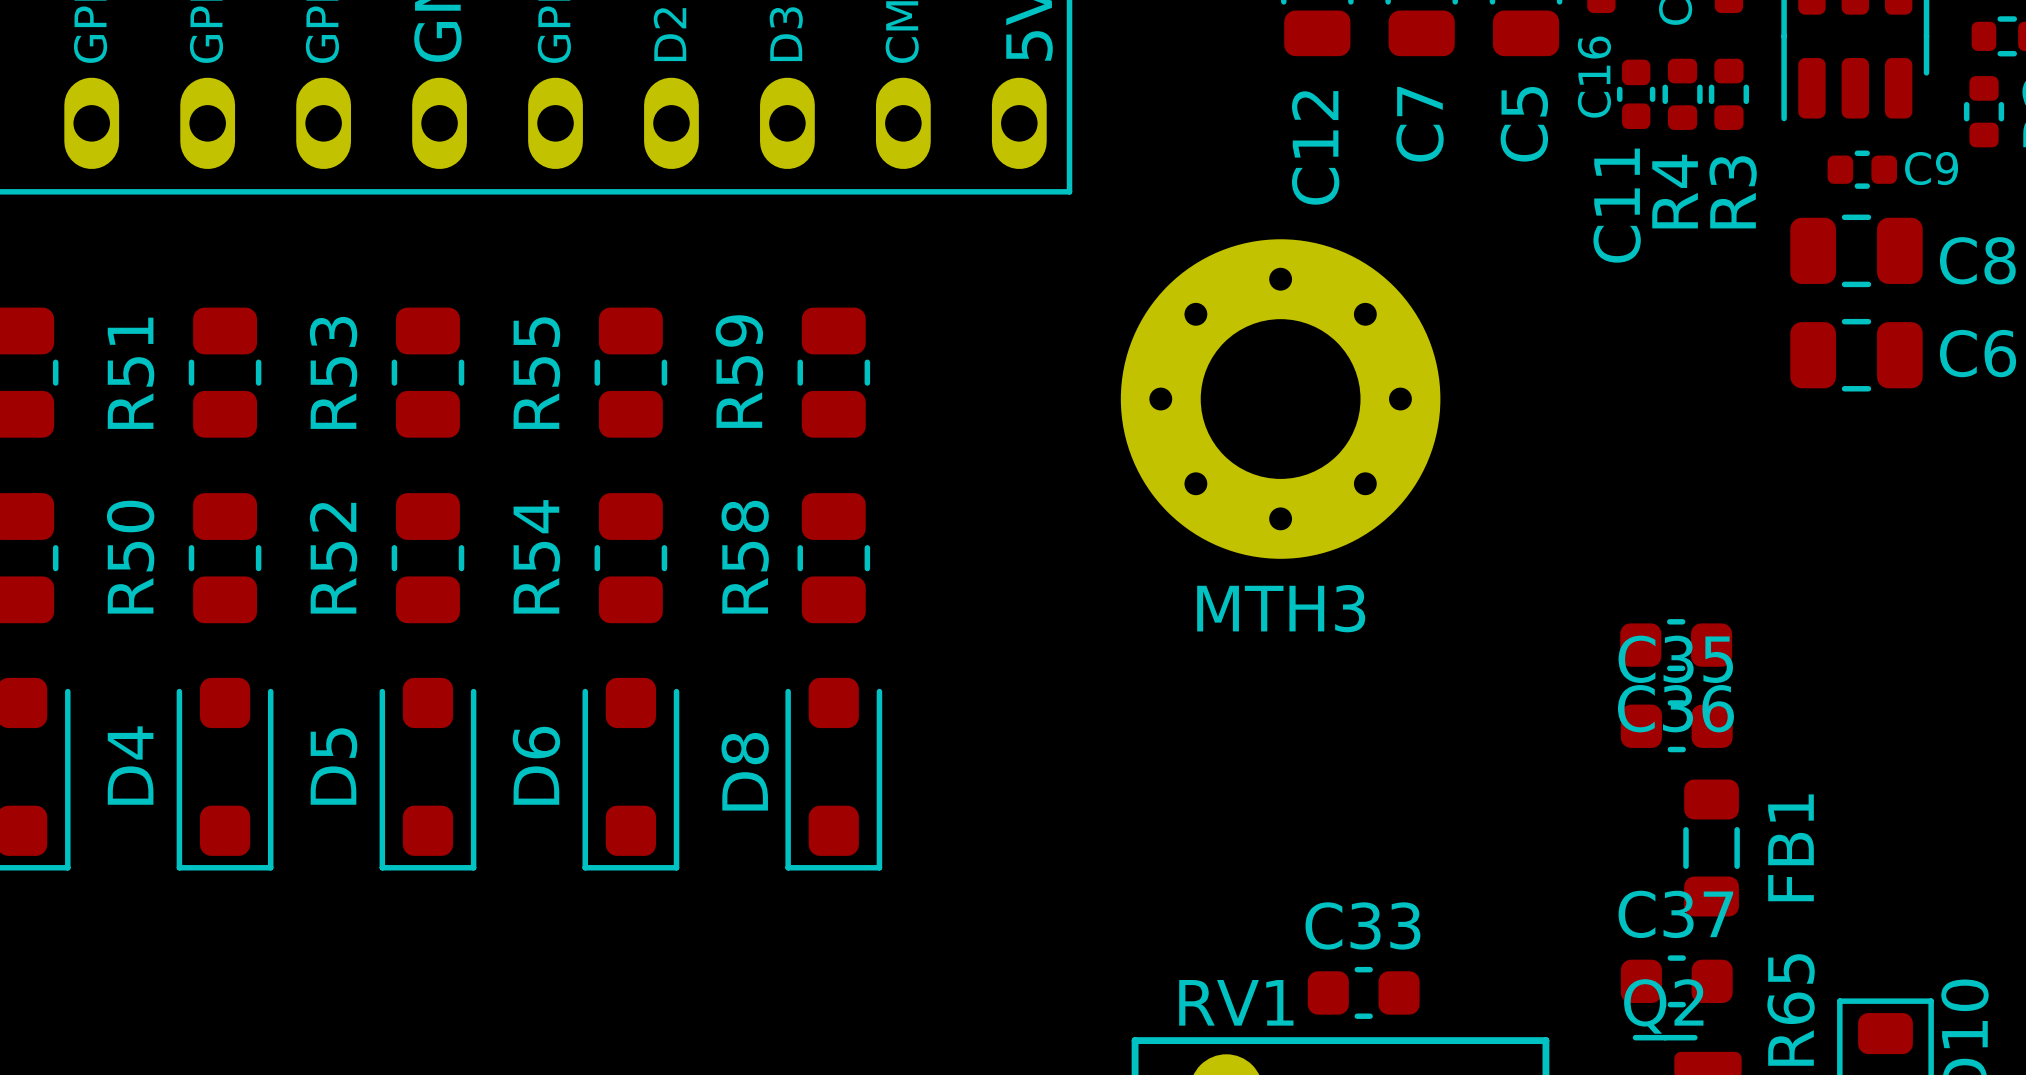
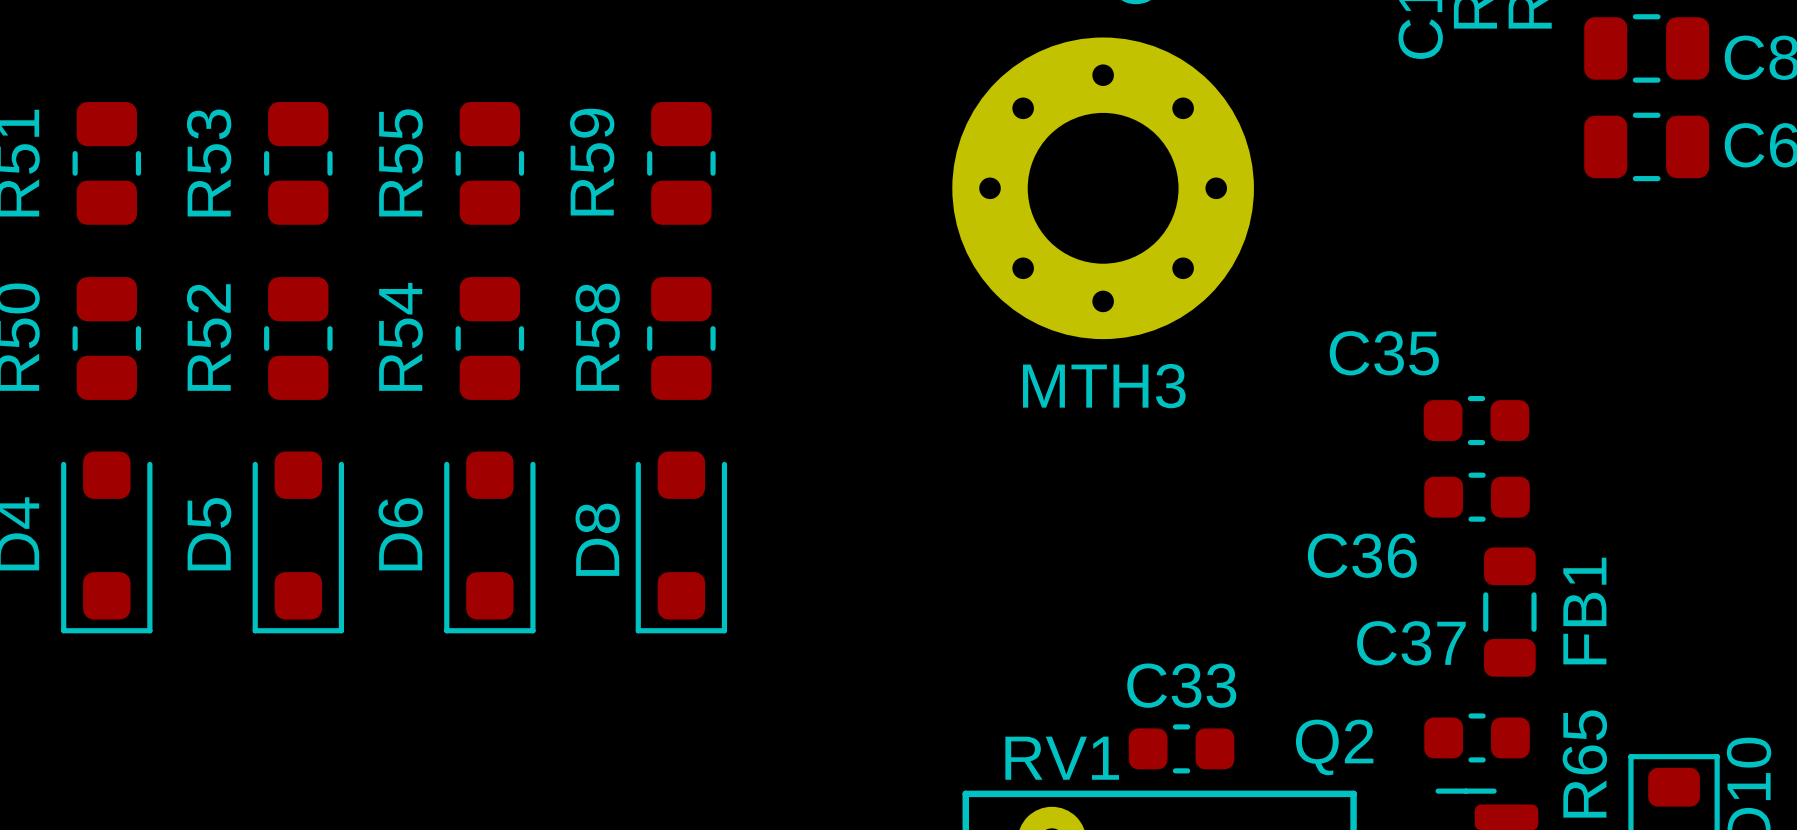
C35 name position: C35 (1675, 659) -> C35 (1384, 353)
C36 name position: C36 (1675, 708) -> C36 (1362, 555)
C37 name position: C37 (1675, 914) -> C37 (1411, 643)
Q2 name position: Q2 (1663, 1006) -> Q2 (1334, 747)

